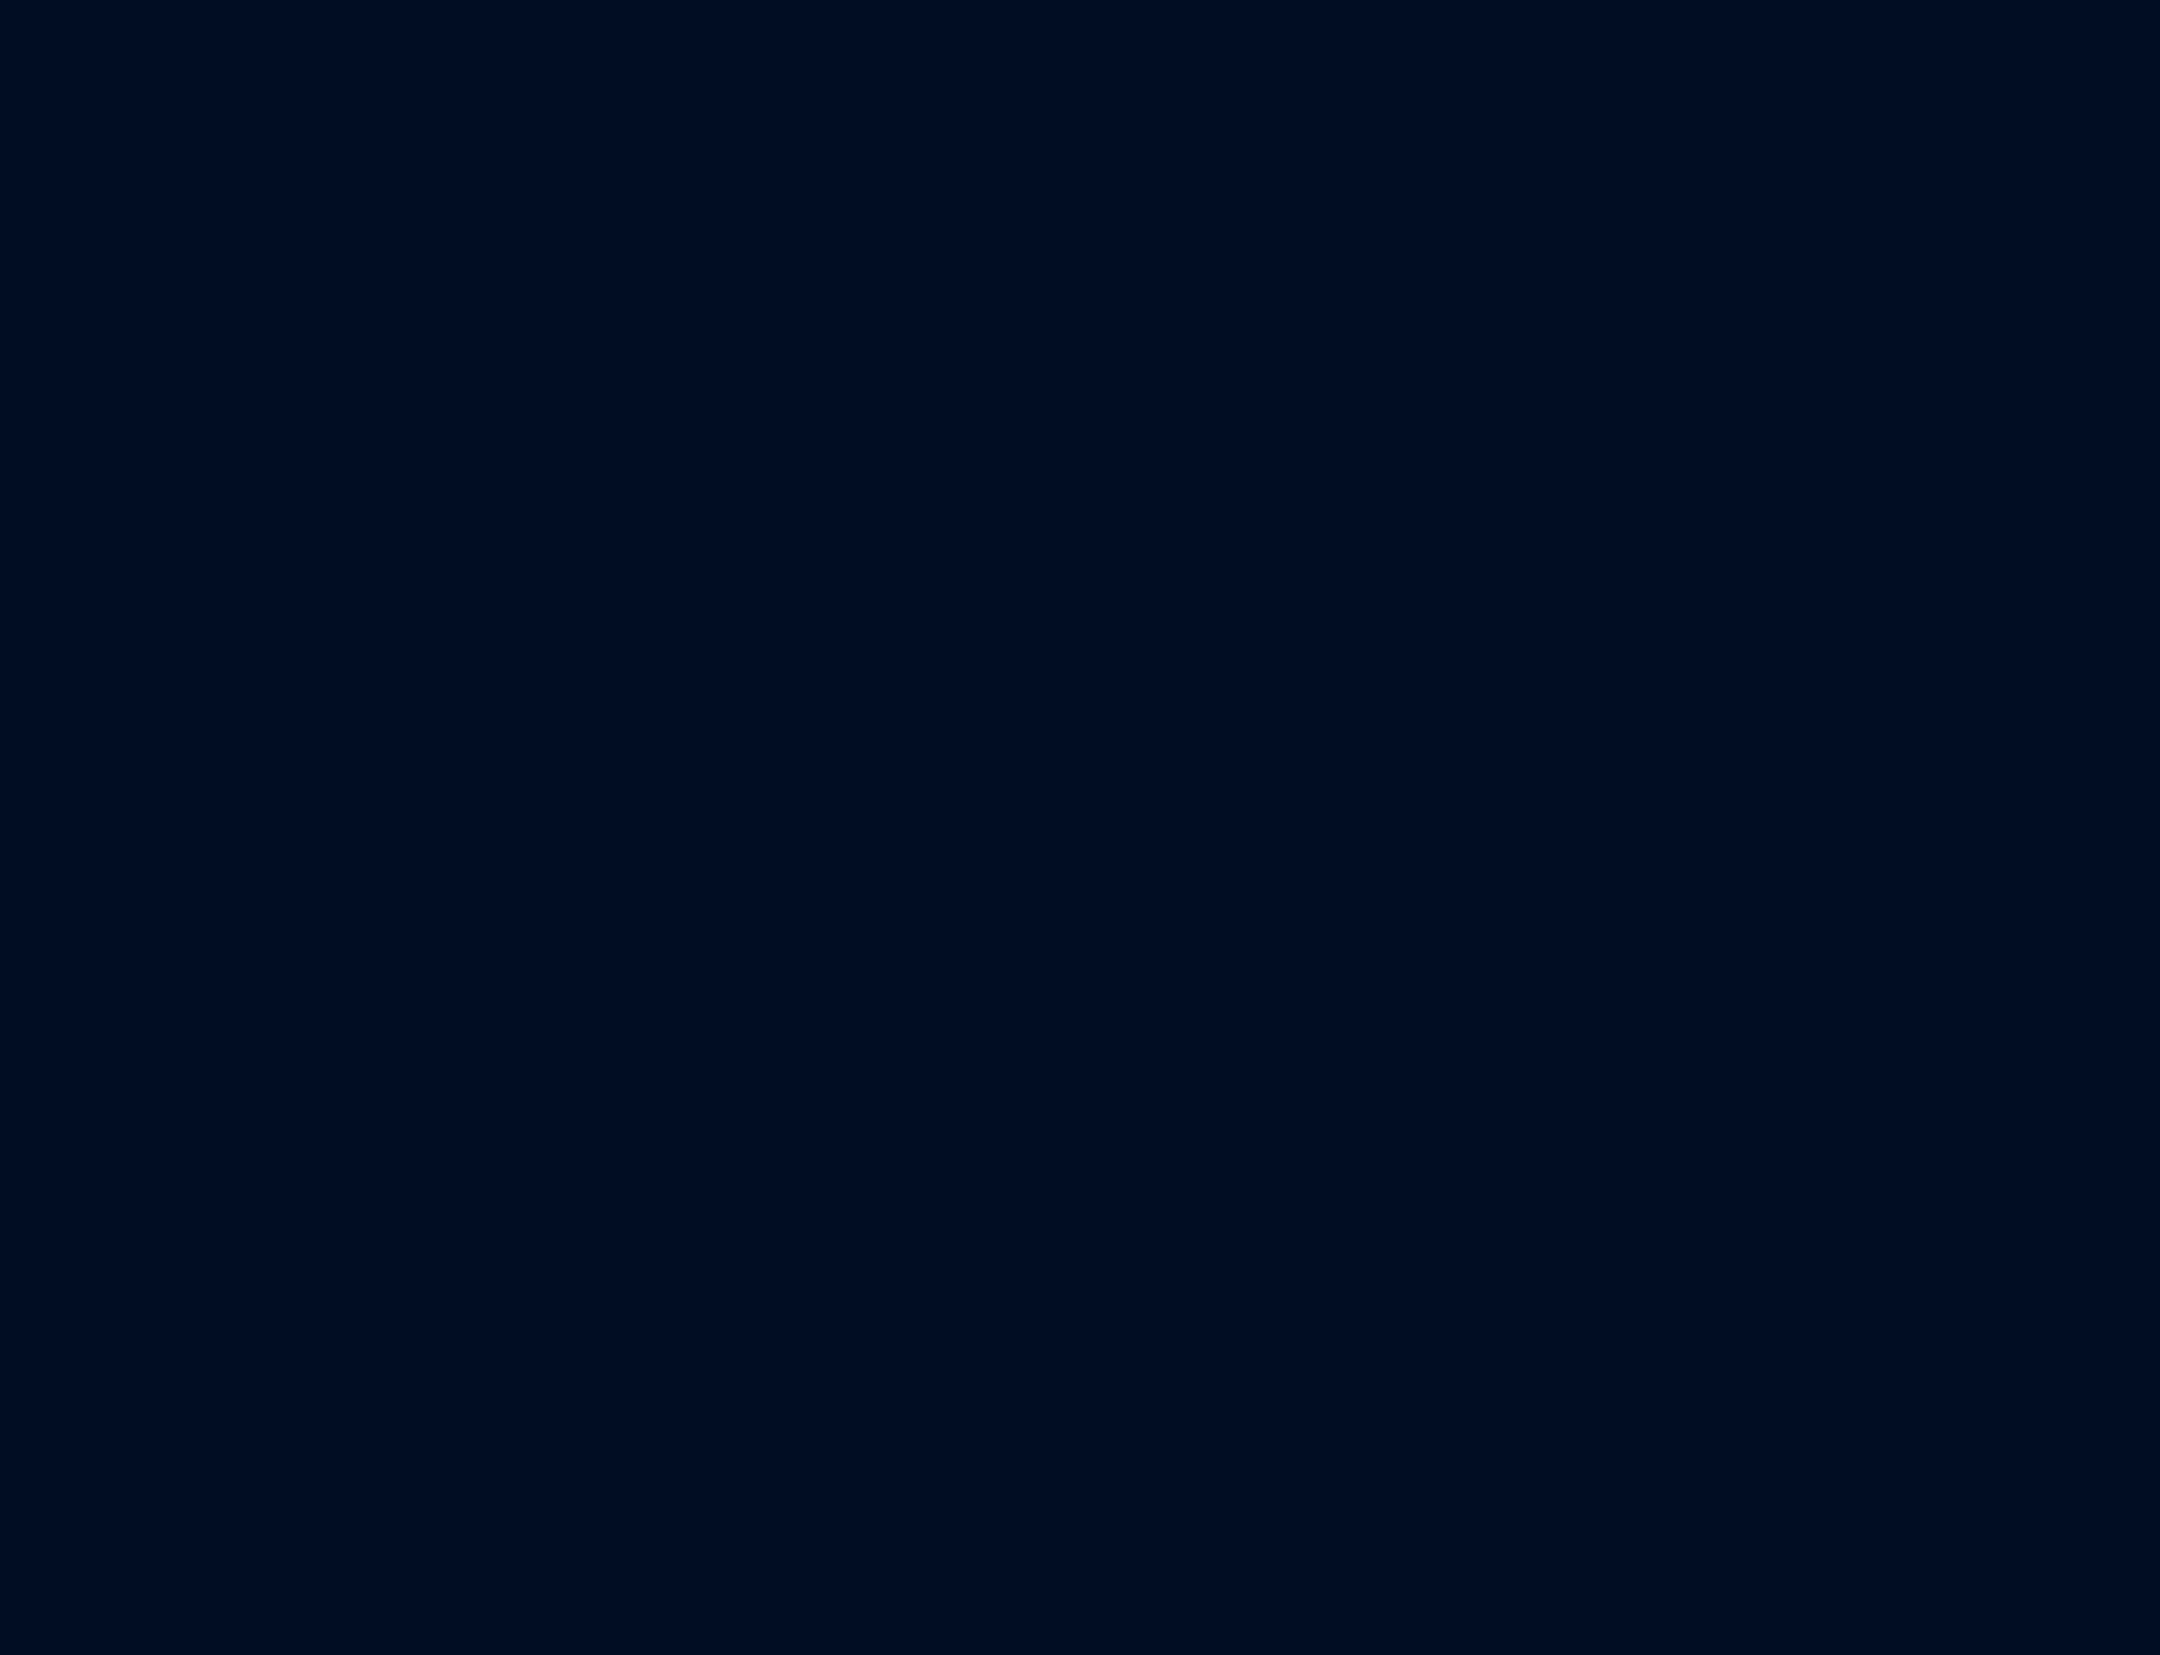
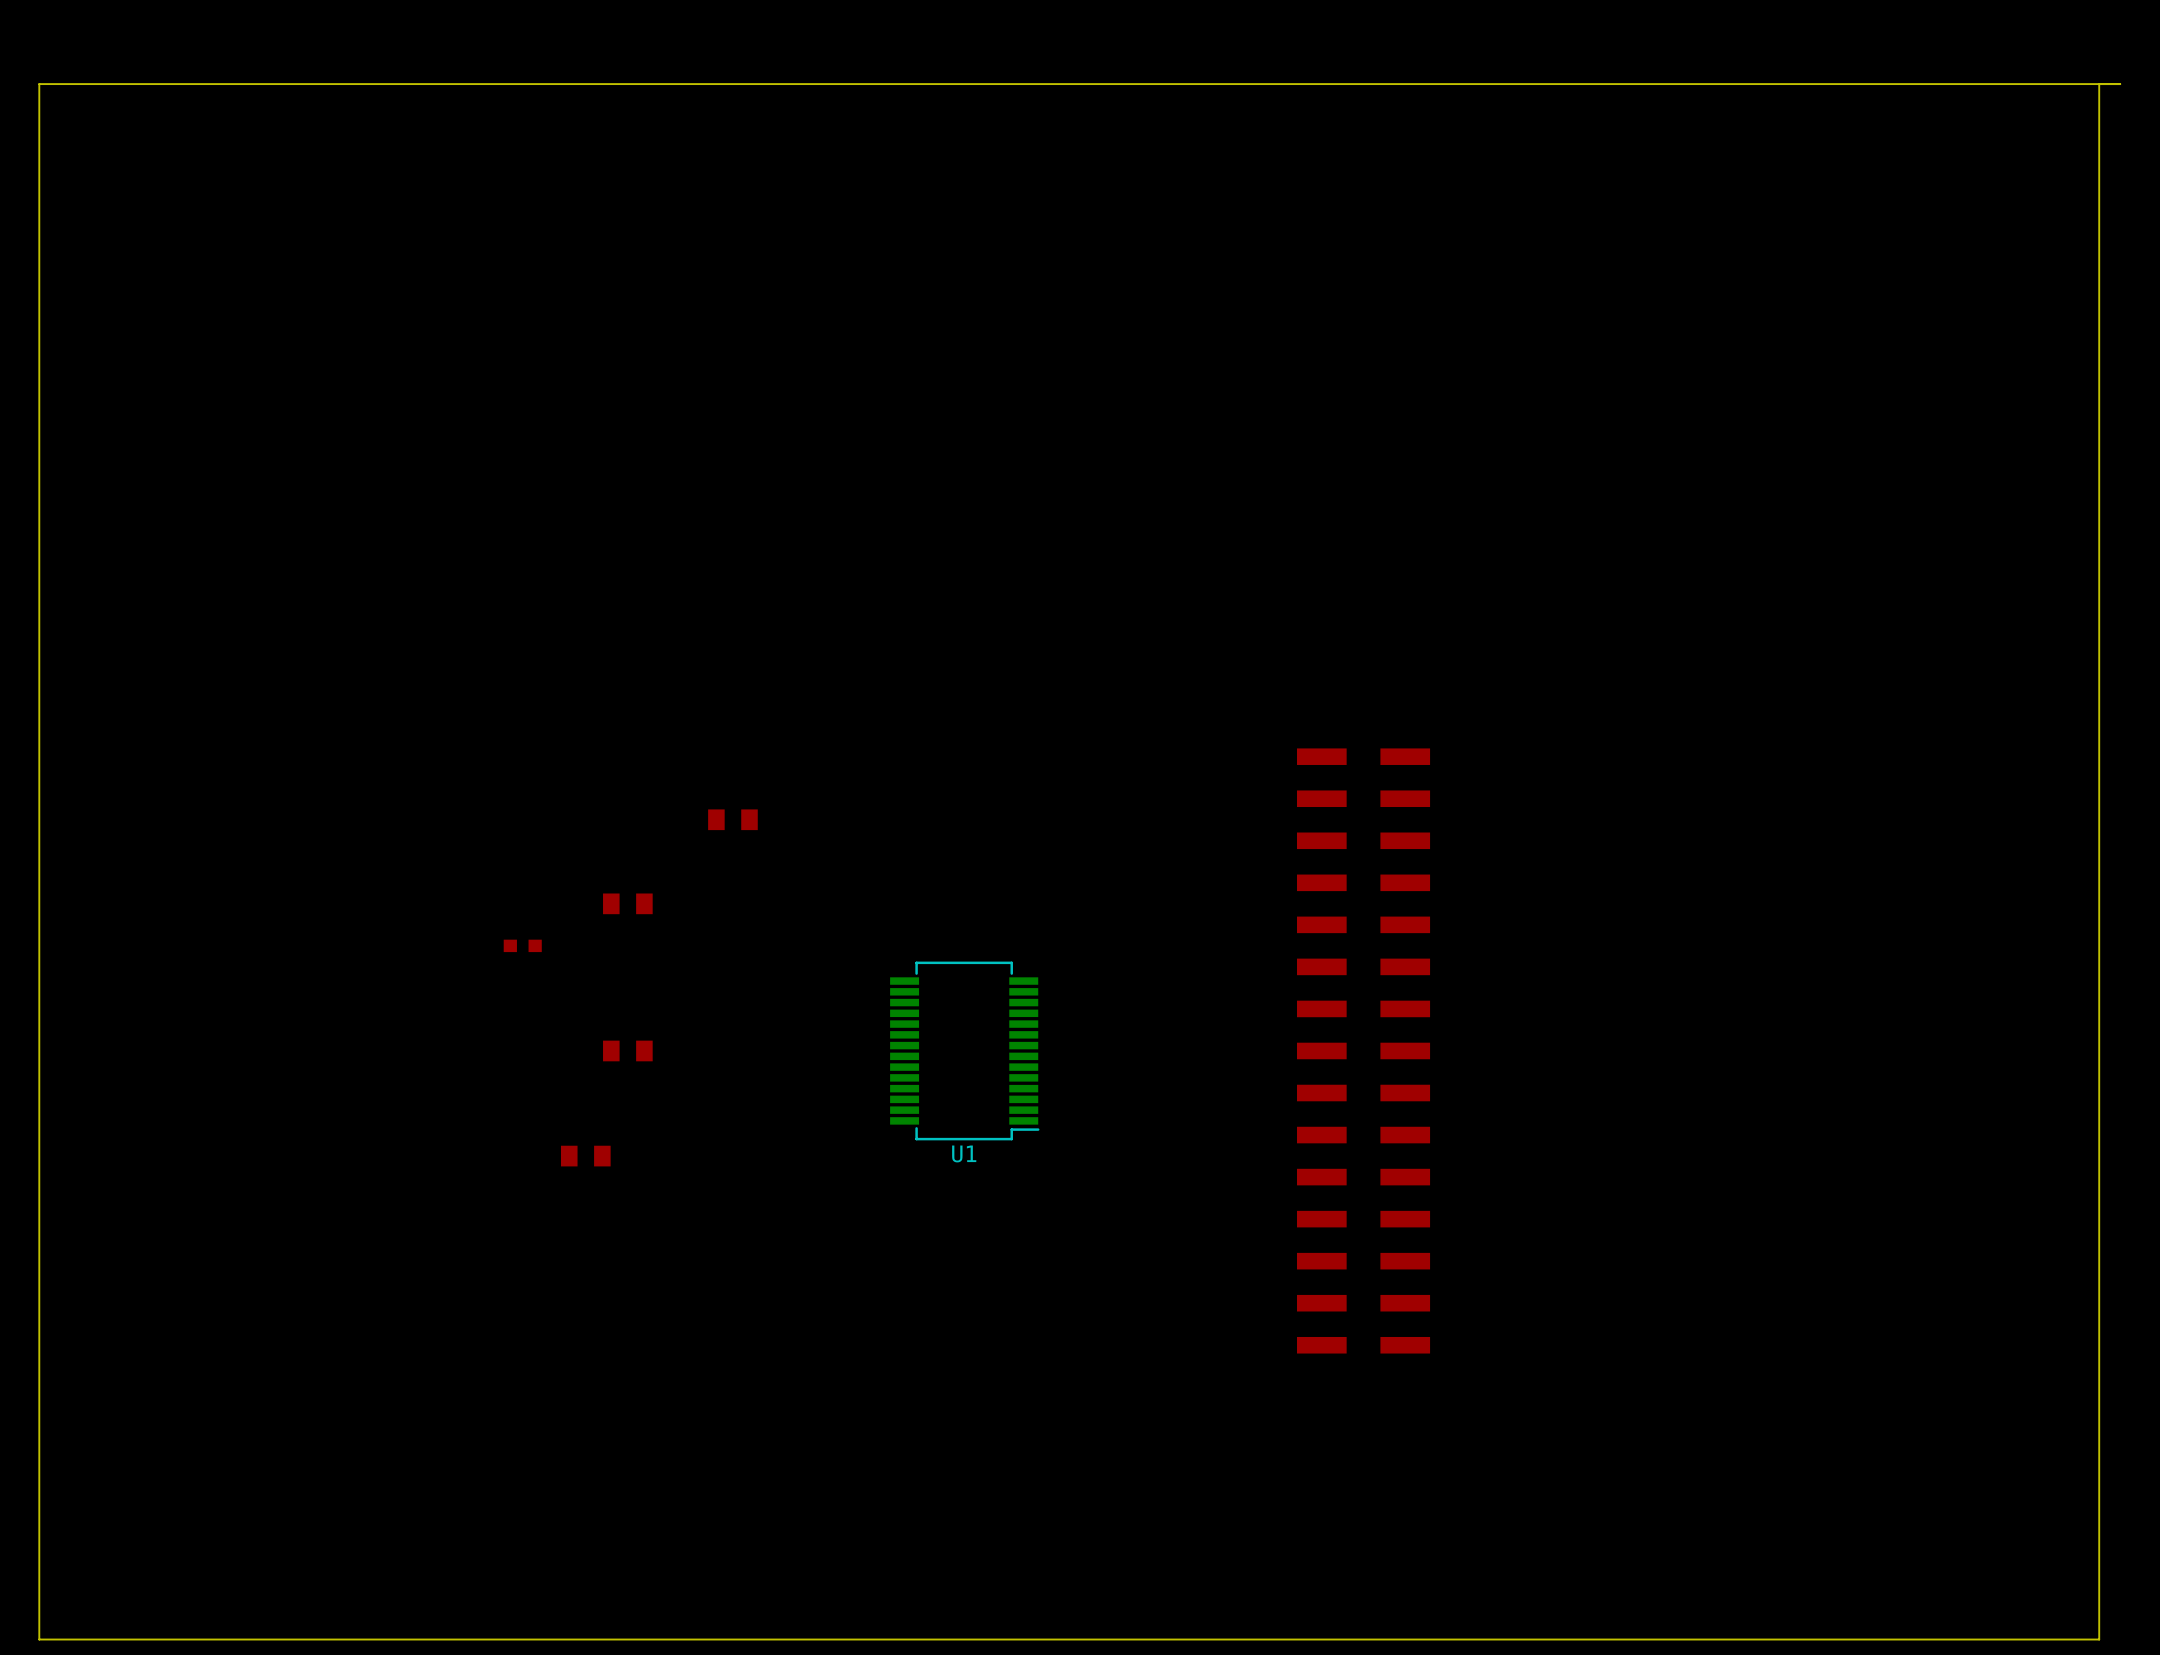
board edge: none -> (2120, 84) (39, 84) (39, 1639) (2099, 1639) (2099, 84)
part: none -> (732, 819)
part: none -> (627, 903)
part: none -> (522, 945)
part: none -> (627, 1050)
U1: none -> (964, 1050)
part: none -> (1363, 1050)
part: none -> (585, 1156)

